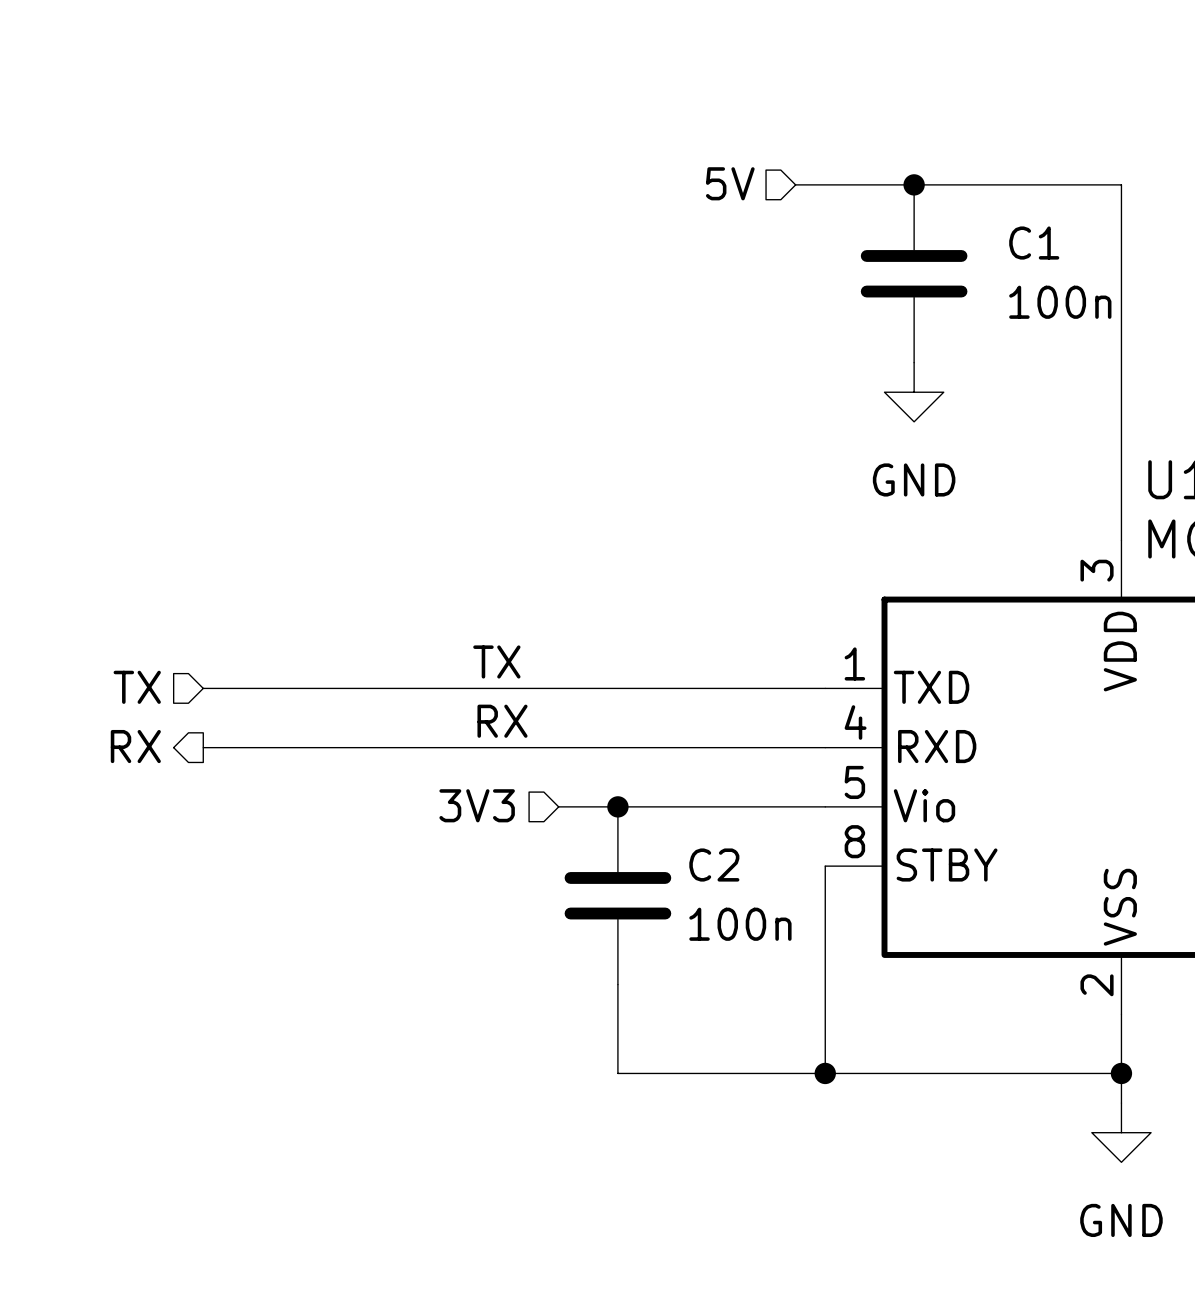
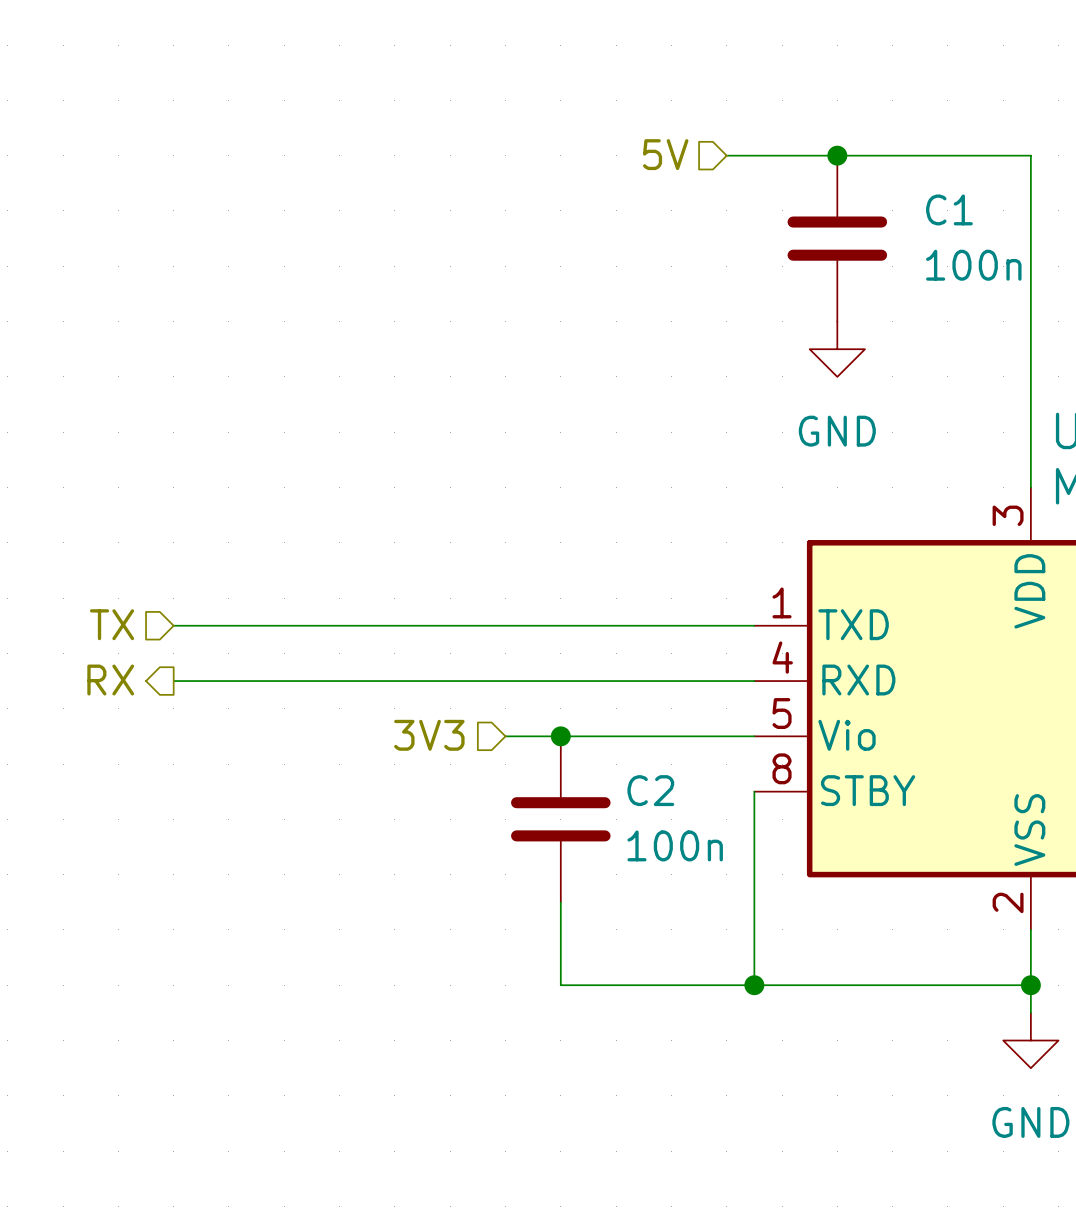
label: TX (496, 661) -> none
label: RX (502, 721) -> none

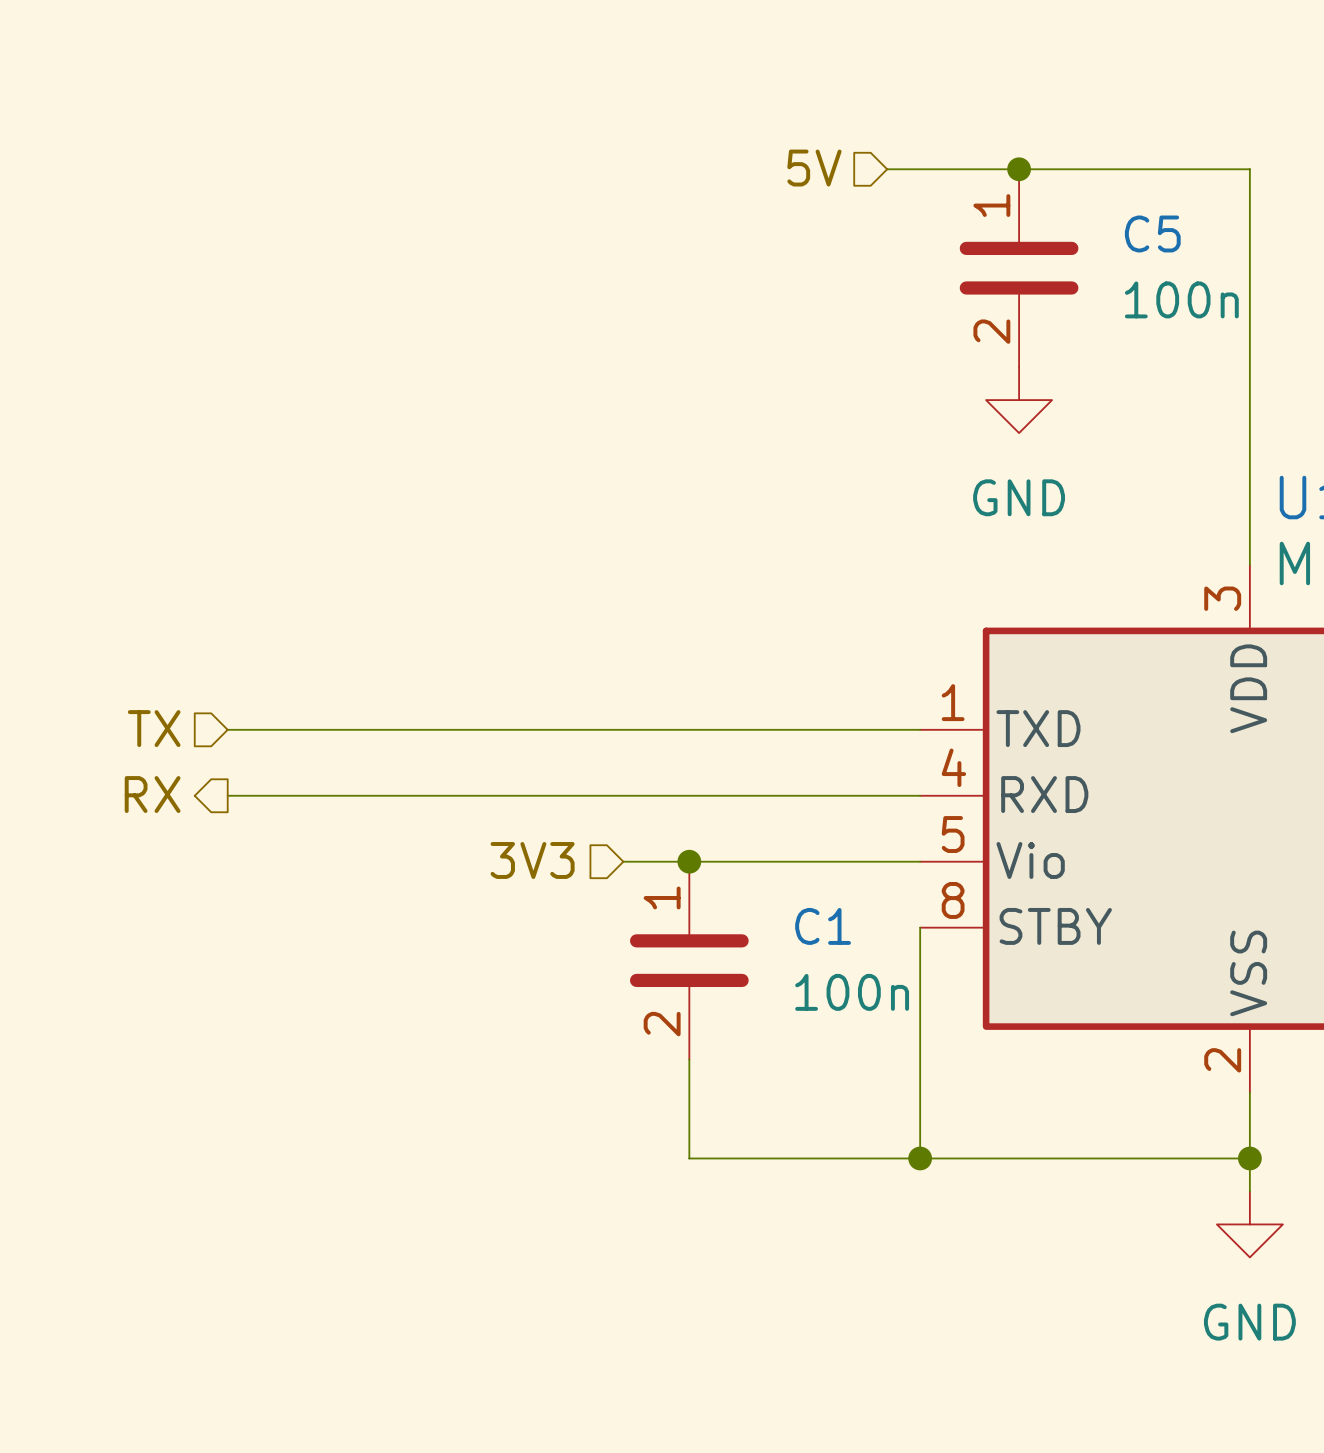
C1 position: (837, 238) -> (689, 960)
C5: none -> 100n (1019, 268)
C1 pin number: none -> 1 (662, 897)
C2: 100n (560, 819) -> none
C1 pin number: none -> 2 (662, 1024)

